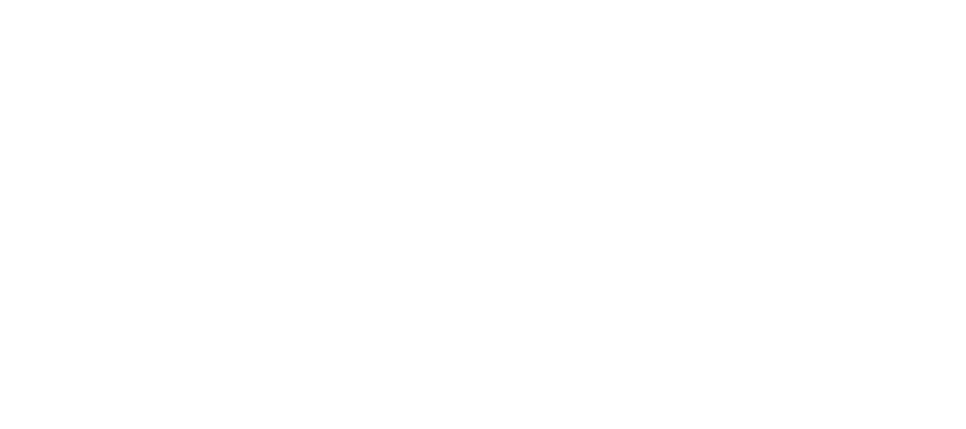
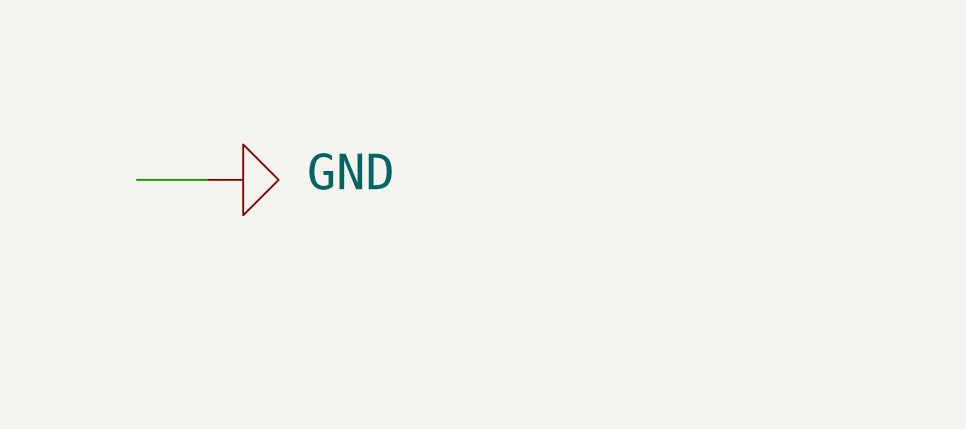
wire: none -> (136, 179) (207, 179)
power symbol: none -> GND (243, 179)

